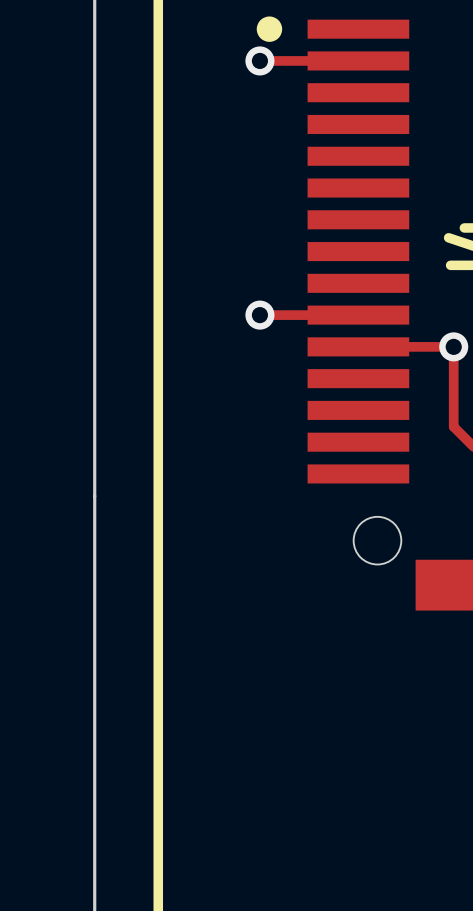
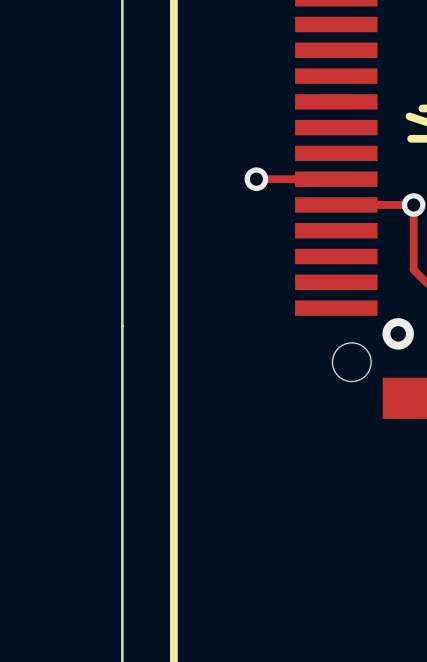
via: none -> (398, 333)

